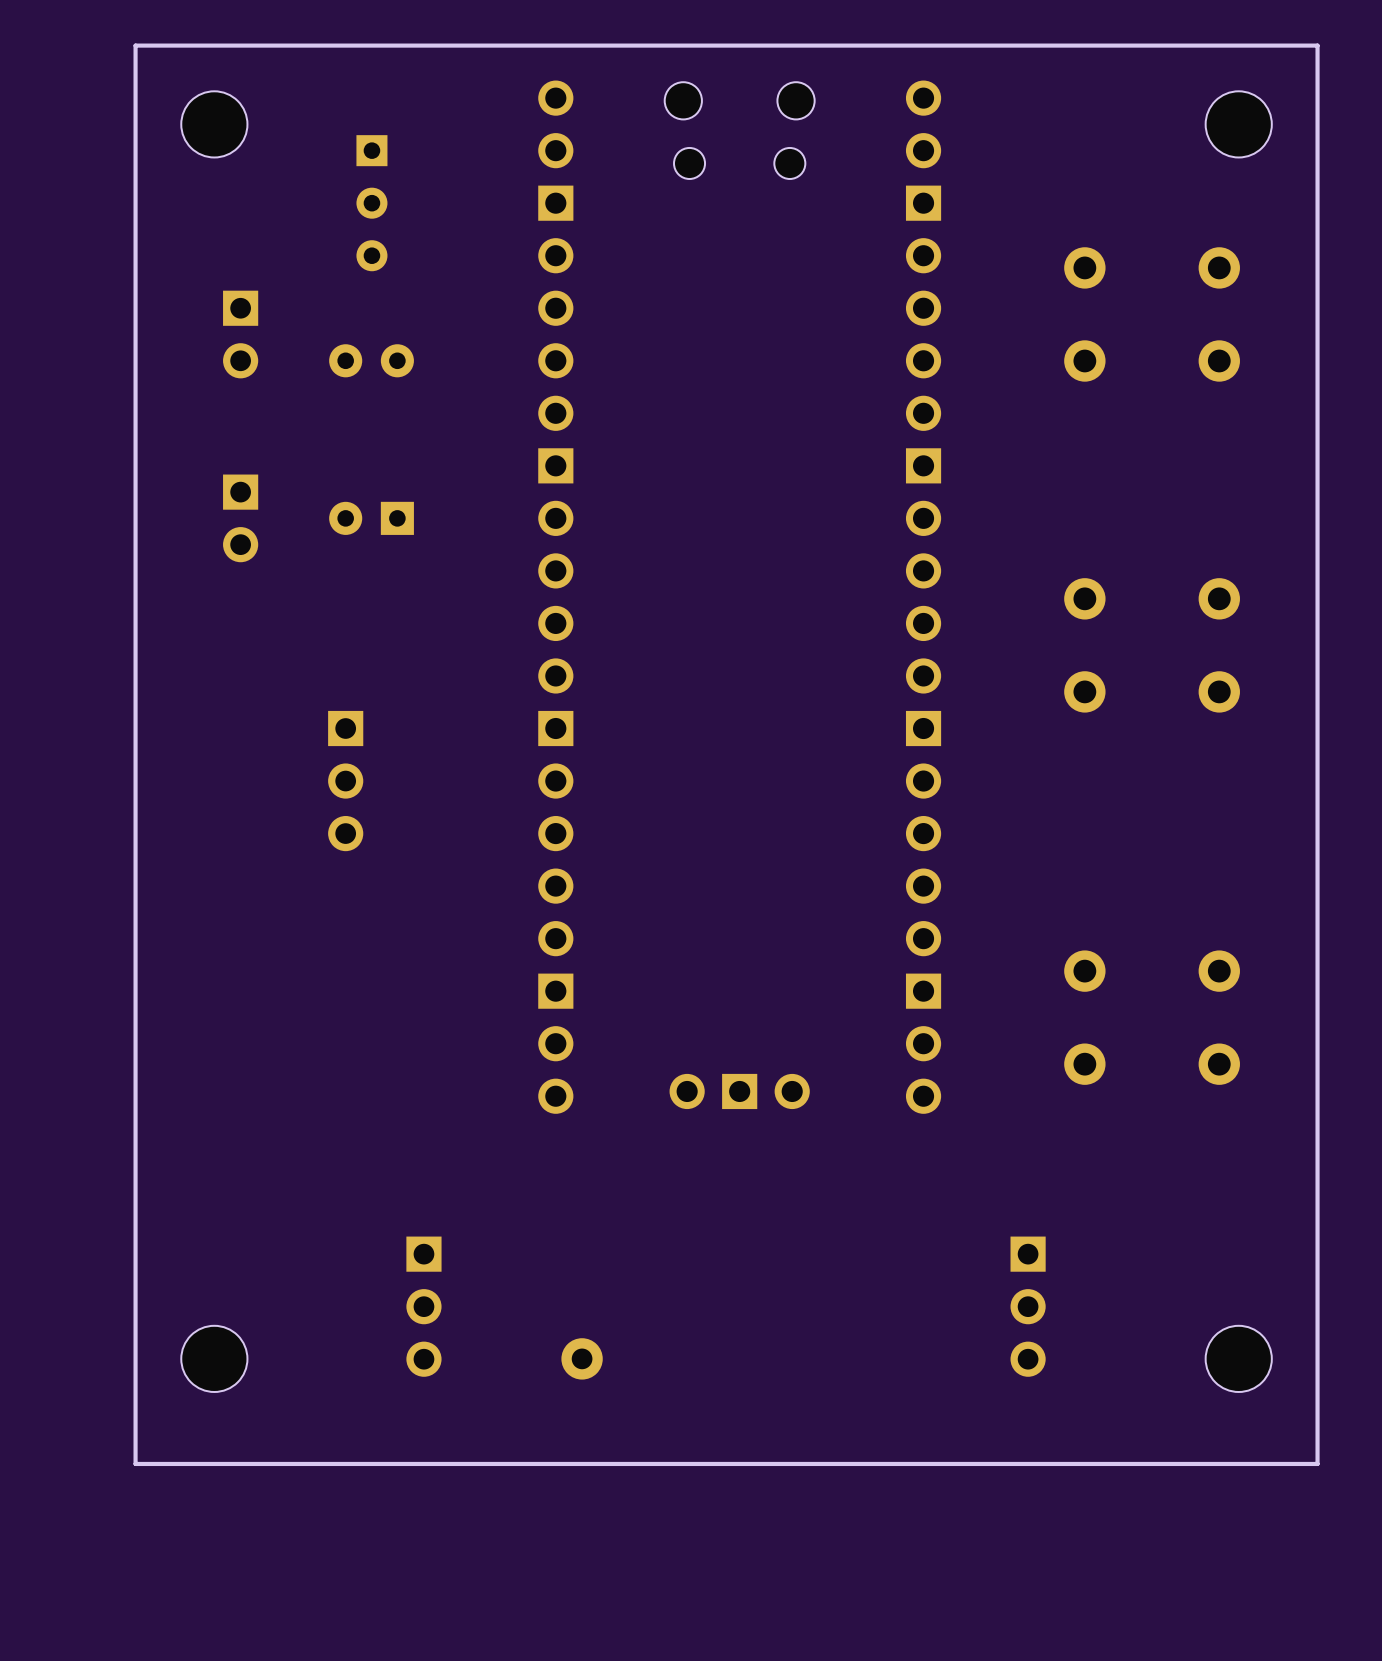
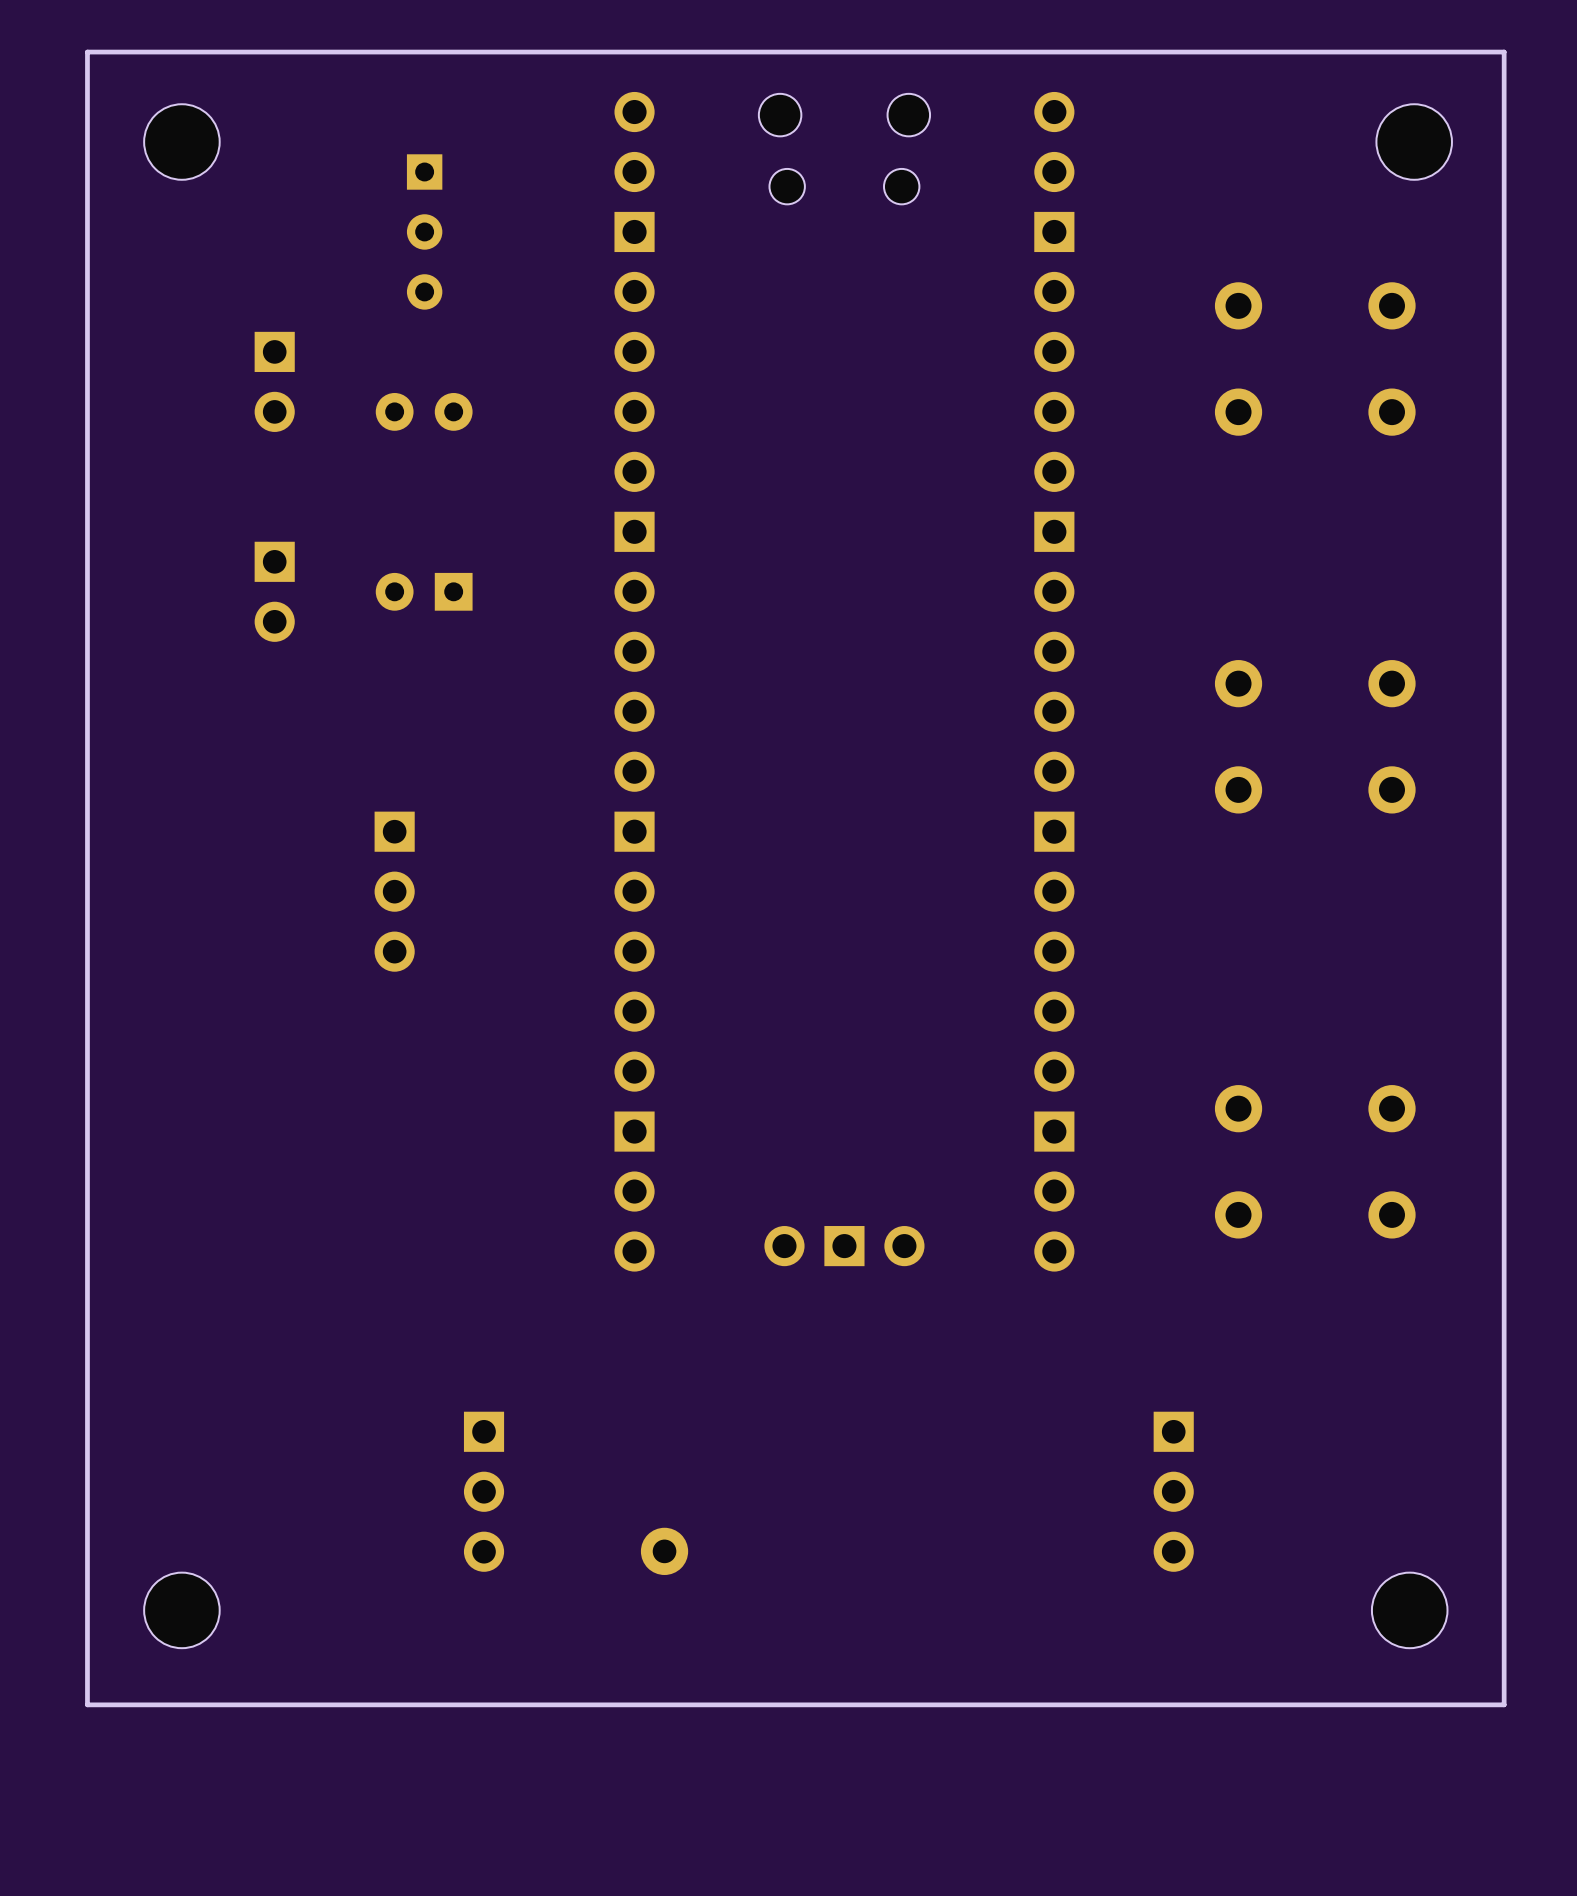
board edge: (135, 45) (135, 1463) (1317, 1463) -> (154, 52) (87, 52) (87, 1704) (1504, 1704) (1504, 1671)
part position: (214, 124) -> (181, 142)
part position: (214, 1358) -> (181, 1610)
part position: (1238, 1358) -> (1409, 1610)

